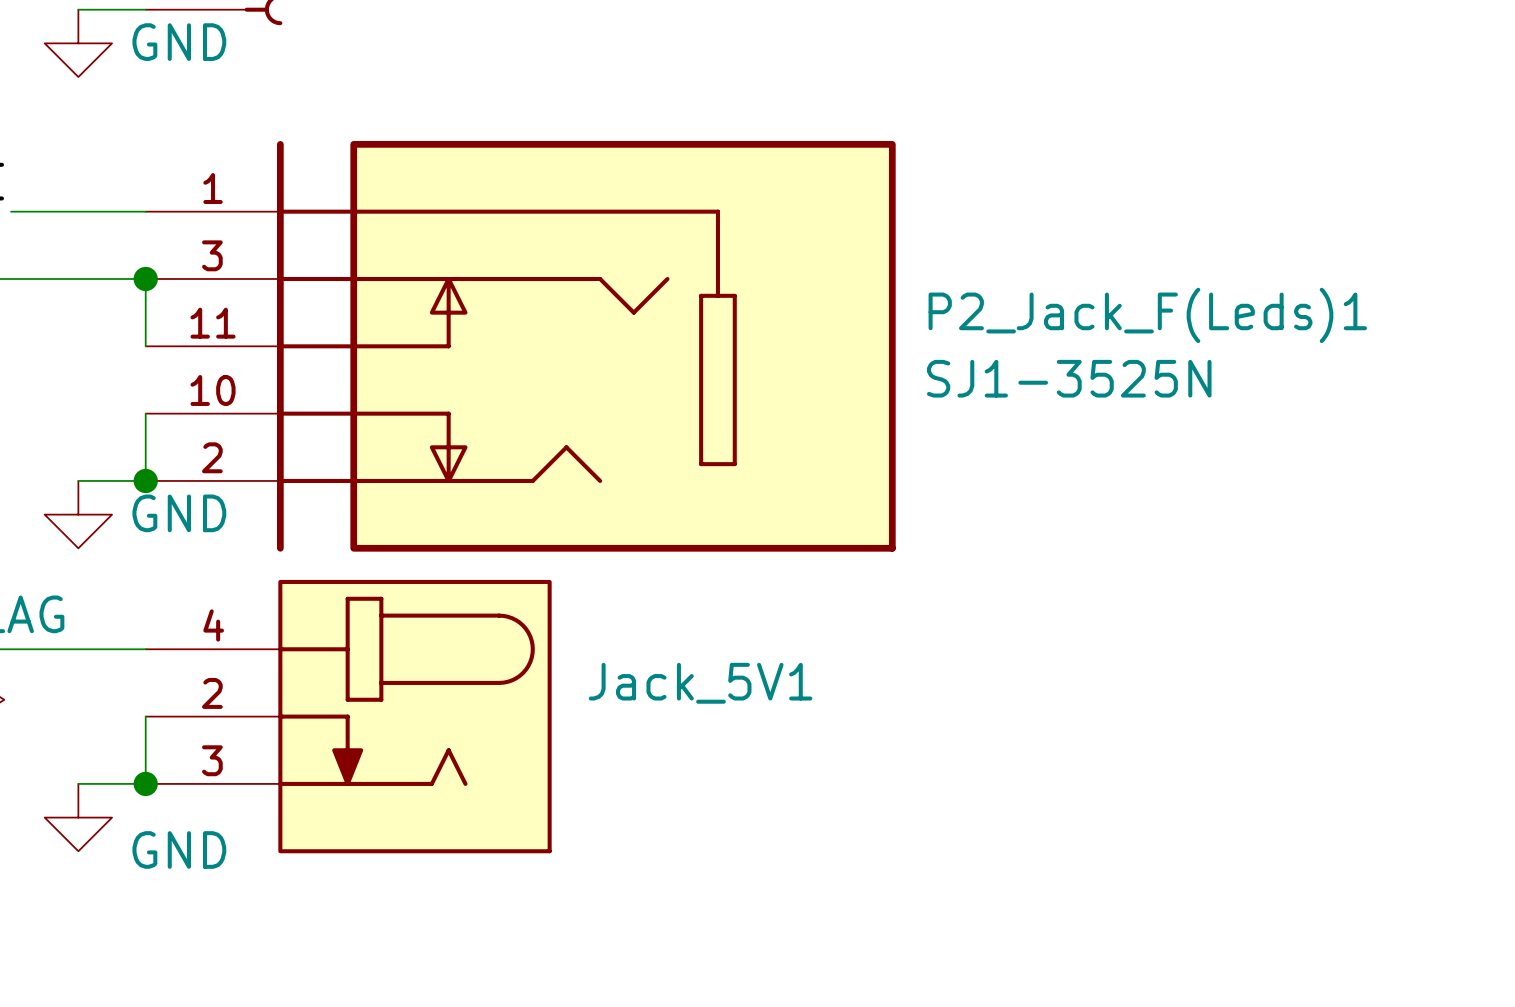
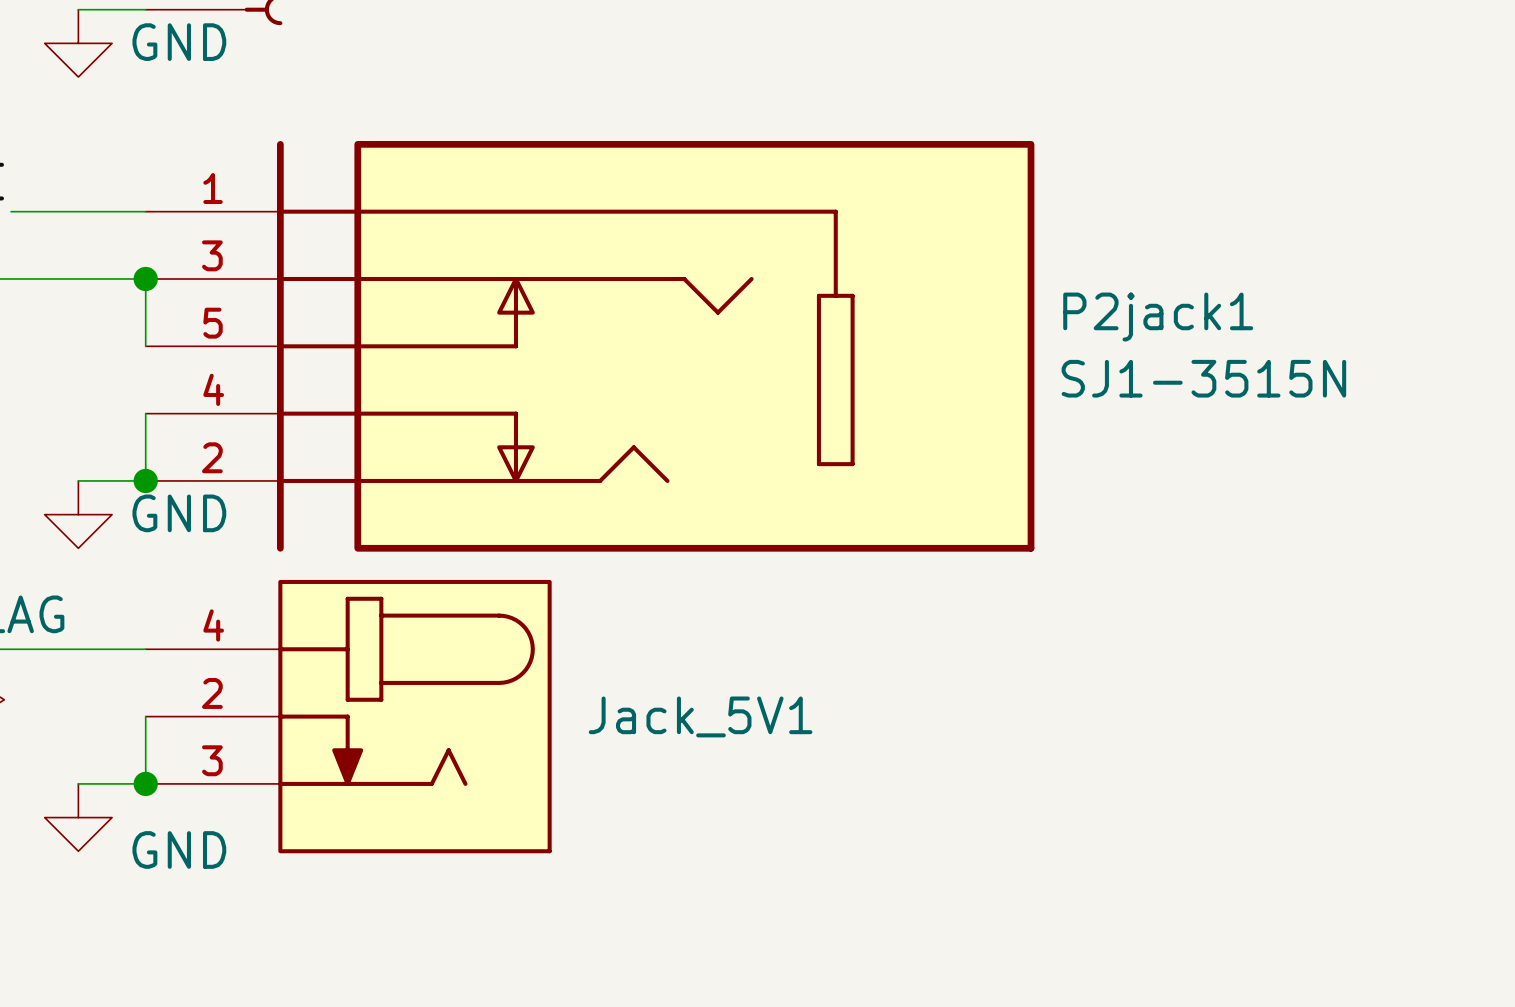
P2_Jack_F(Leds)1: SJ1-3525N (520, 346) -> none
P2jack1: none -> SJ1-3515N (590, 346)
Jack_5V1 name position: Jack_5V1 (700, 683) -> Jack_5V1 (700, 716)

